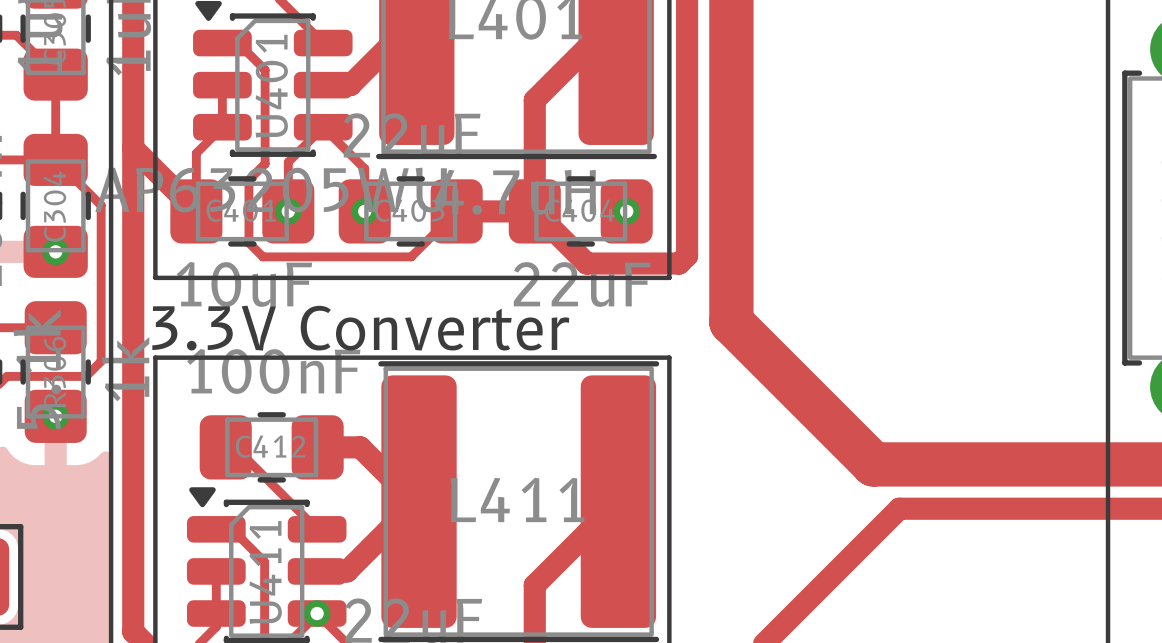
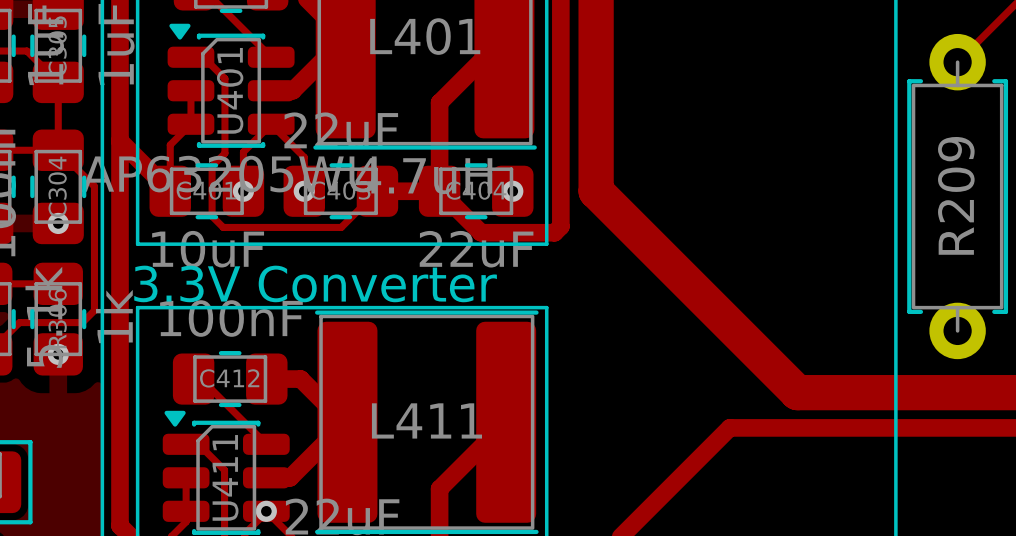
track: (731, 211) (731, 322) (873, 464) (984, 464) -> (596, 191) (797, 392)

